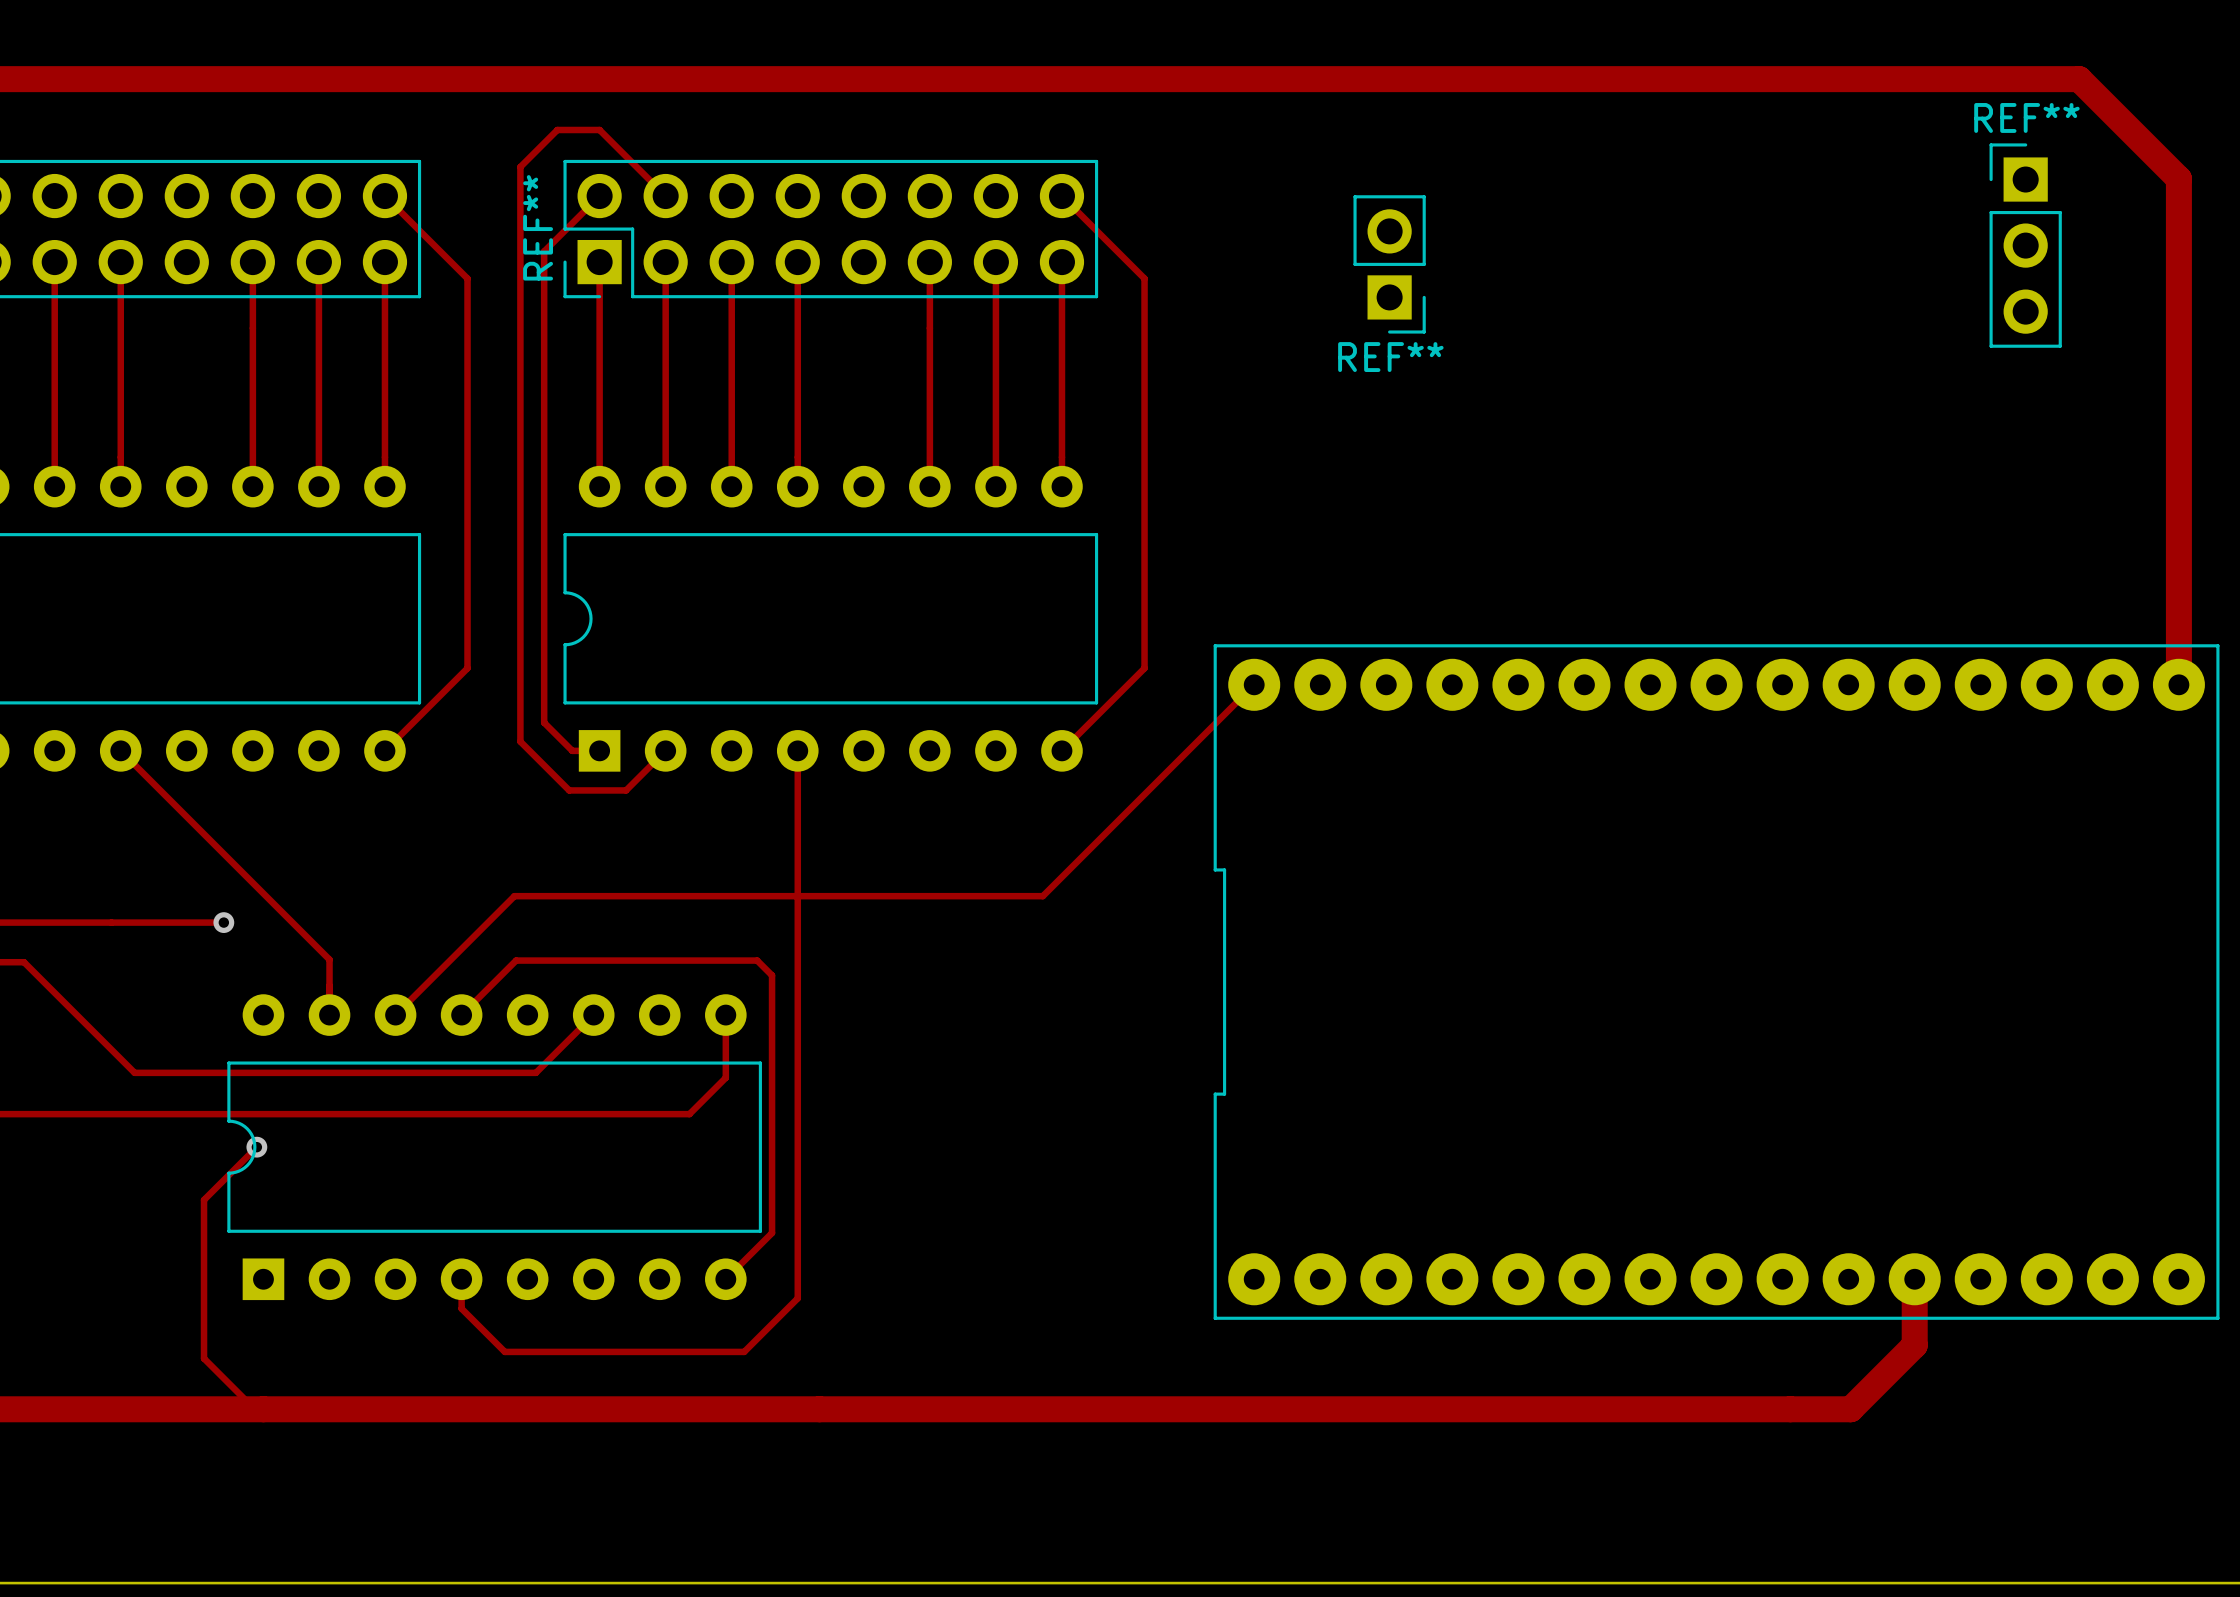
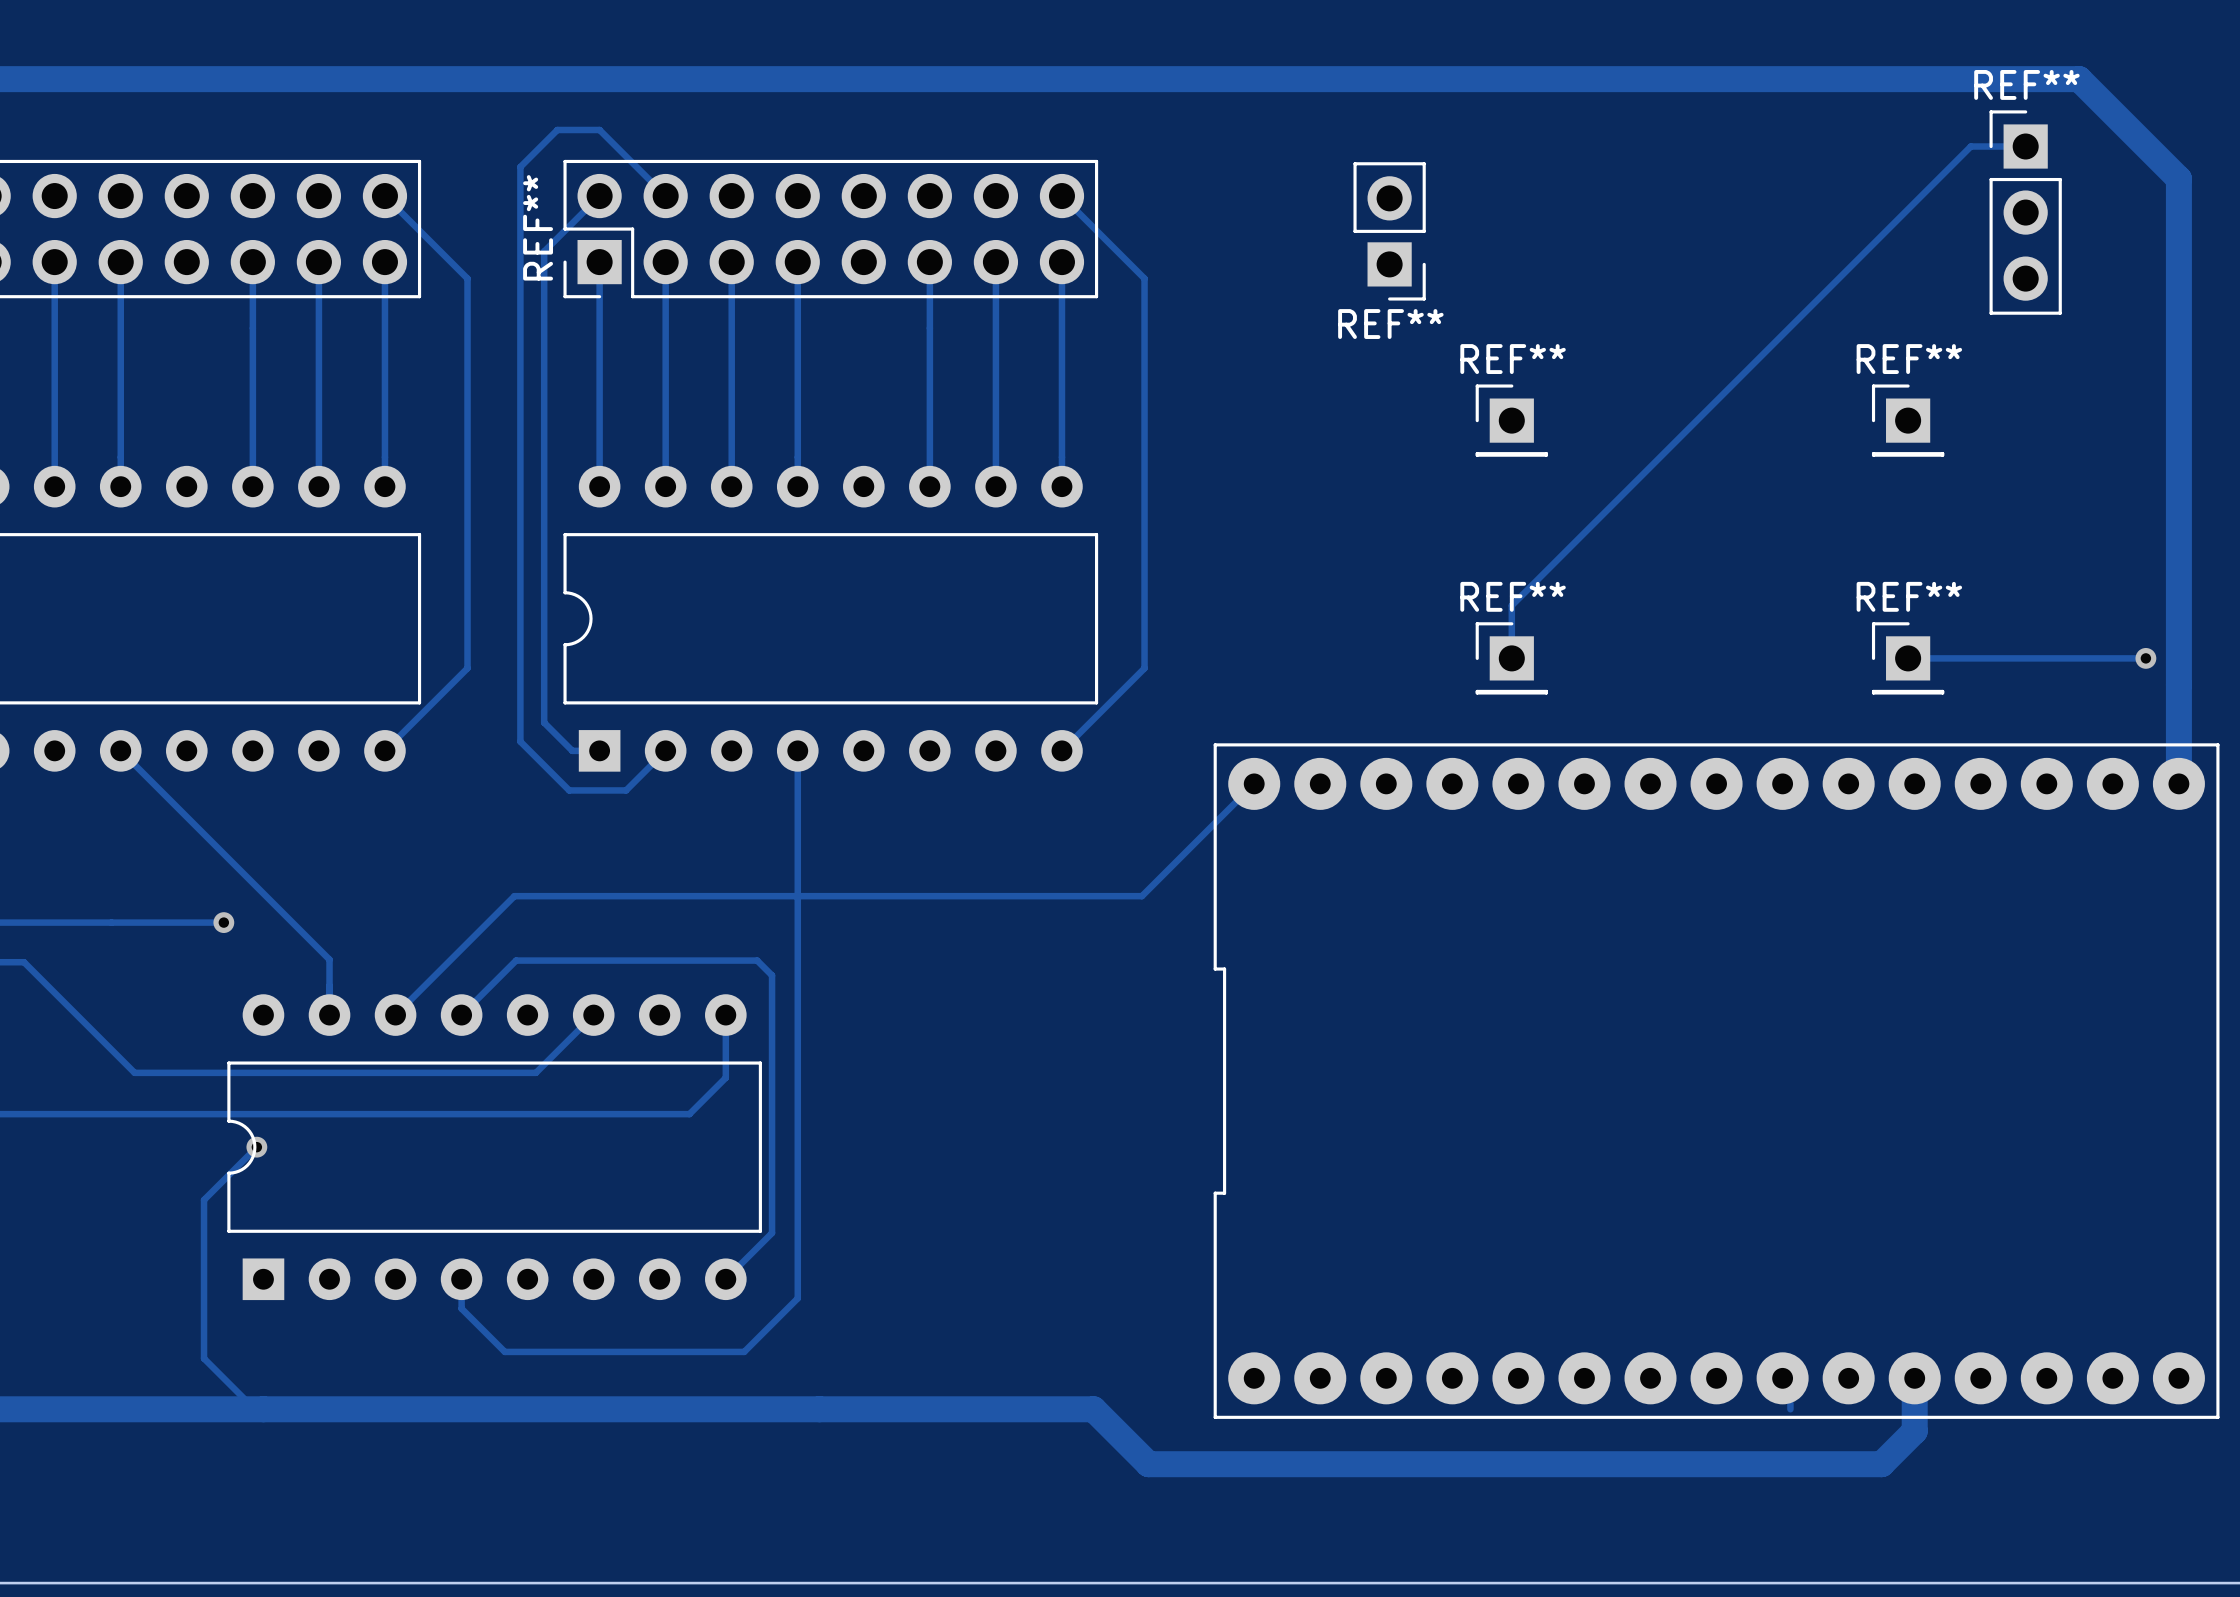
track: none -> (2025, 146) (1970, 146) (1511, 605) (1511, 658)
REF** position: (2025, 245) -> (2025, 212)
REF** position: (1389, 264) -> (1389, 231)
REF**: none -> (1511, 420)
REF**: none -> (1908, 420)
REF**: none -> (1511, 658)
track: none -> (1908, 658) (2145, 658)
REF**: none -> (1908, 658)
via: none -> (2145, 658)
track: (1254, 684) (1042, 896) -> (1254, 783) (1141, 896) (1042, 896)
track: none -> (2178, 684) (2178, 783)
part position: (1716, 982) -> (1716, 1081)
track: (1914, 1279) (1914, 1345) (1850, 1409) (1093, 1409) -> (1914, 1378) (1914, 1431) (1881, 1464) (1148, 1464) (1093, 1409)

